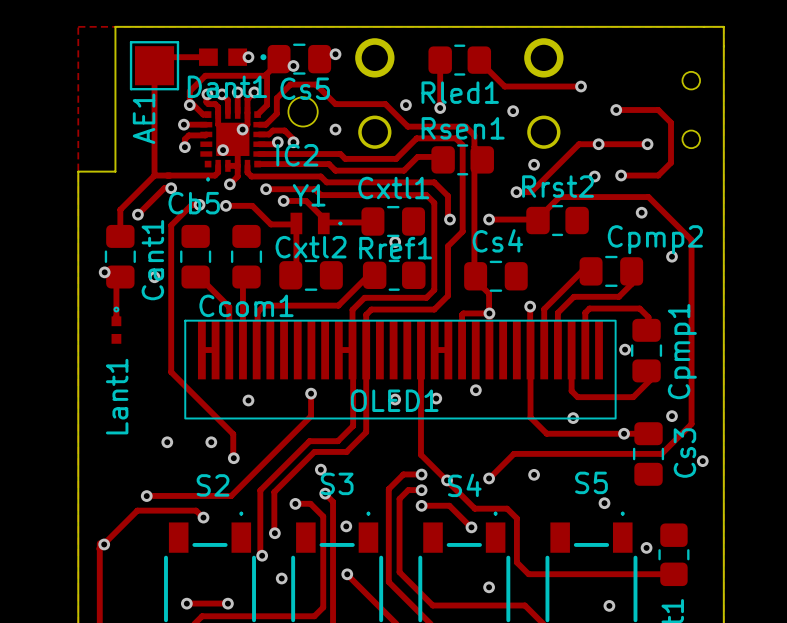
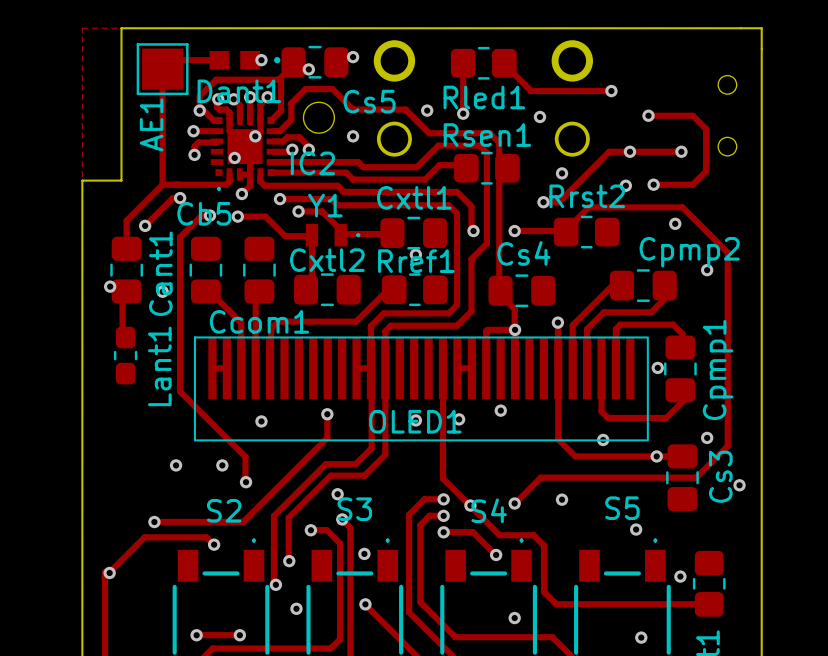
Cs5 name position: Cs5 (305, 88) -> Cs5 (369, 101)
Lant1 footprint: [111, 306, 122, 344] -> [113, 326, 138, 385]
Lant1 name position: Lant1 (117, 396) -> Lant1 (159, 366)

